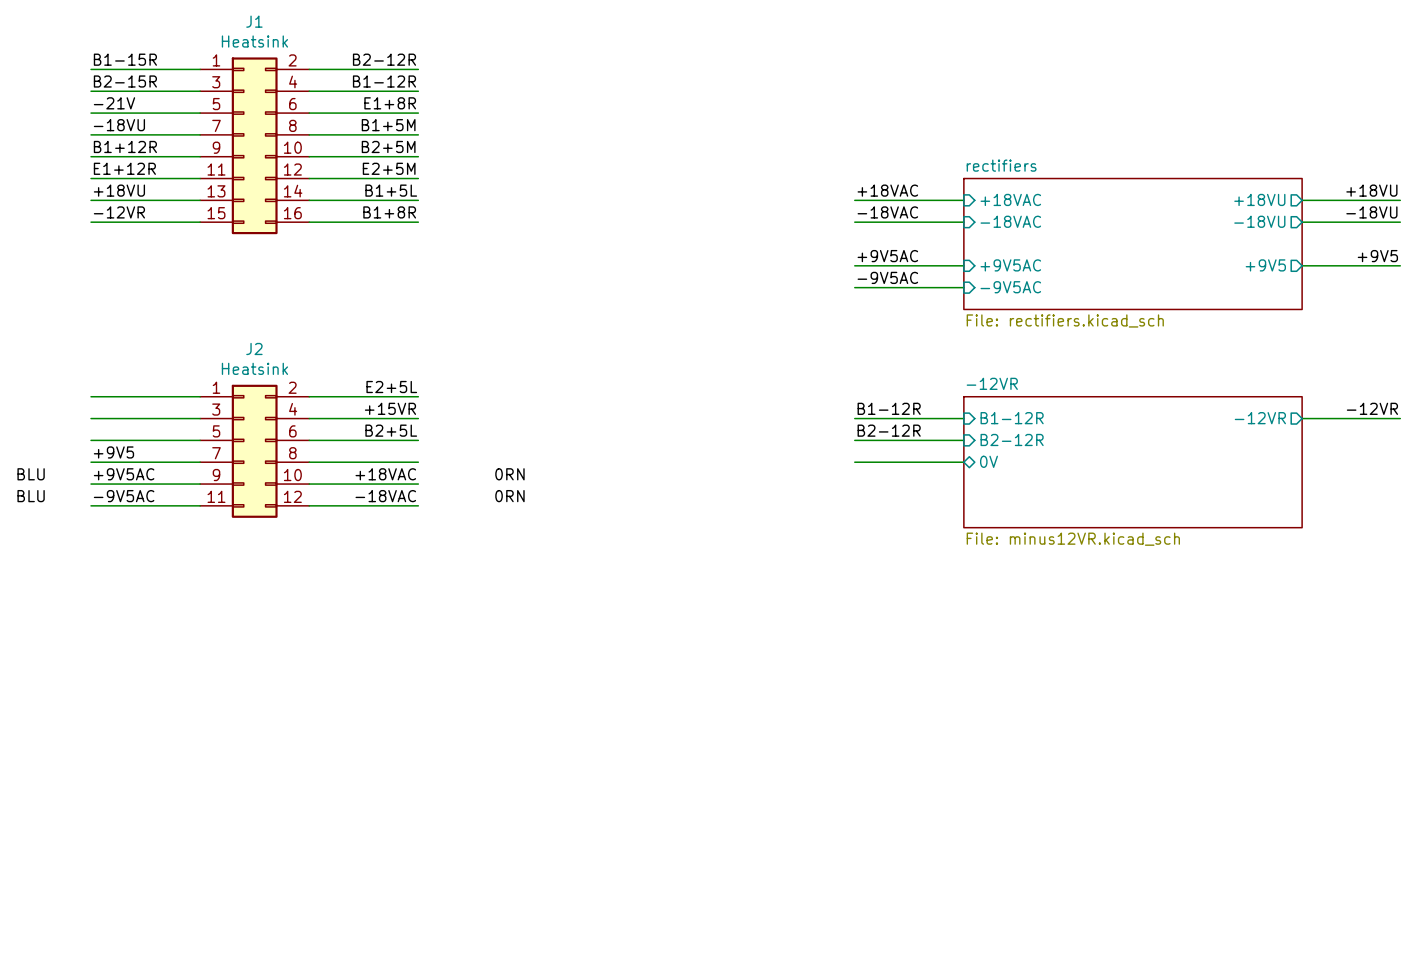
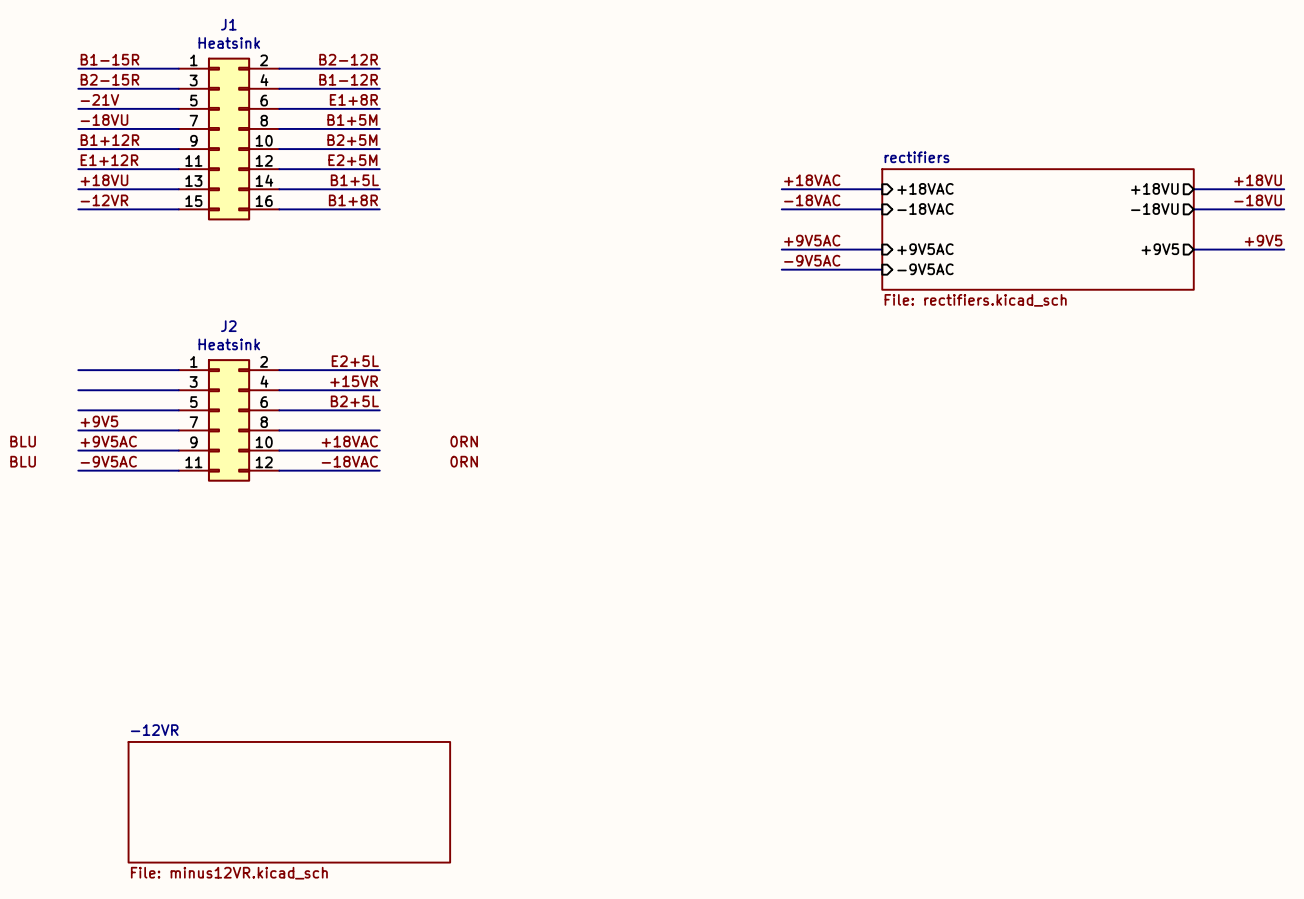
sheet -12VR shape: [963, 396, 1303, 528] -> [128, 741, 451, 863]
label: B1-12R (889, 408) -> none
label: -12VR (1372, 408) -> none
wire: (854, 418) (963, 418) -> none
sheet pin: B1-12R (1012, 418) -> none
sheet pin: -12VR (1260, 418) -> none
wire: (1302, 418) (1400, 418) -> none
label: B2-12R (889, 430) -> none
sheet pin: B2-12R (1012, 439) -> none
wire: (854, 440) (963, 440) -> none
sheet pin: 0V (988, 461) -> none
wire: (854, 462) (963, 462) -> none

